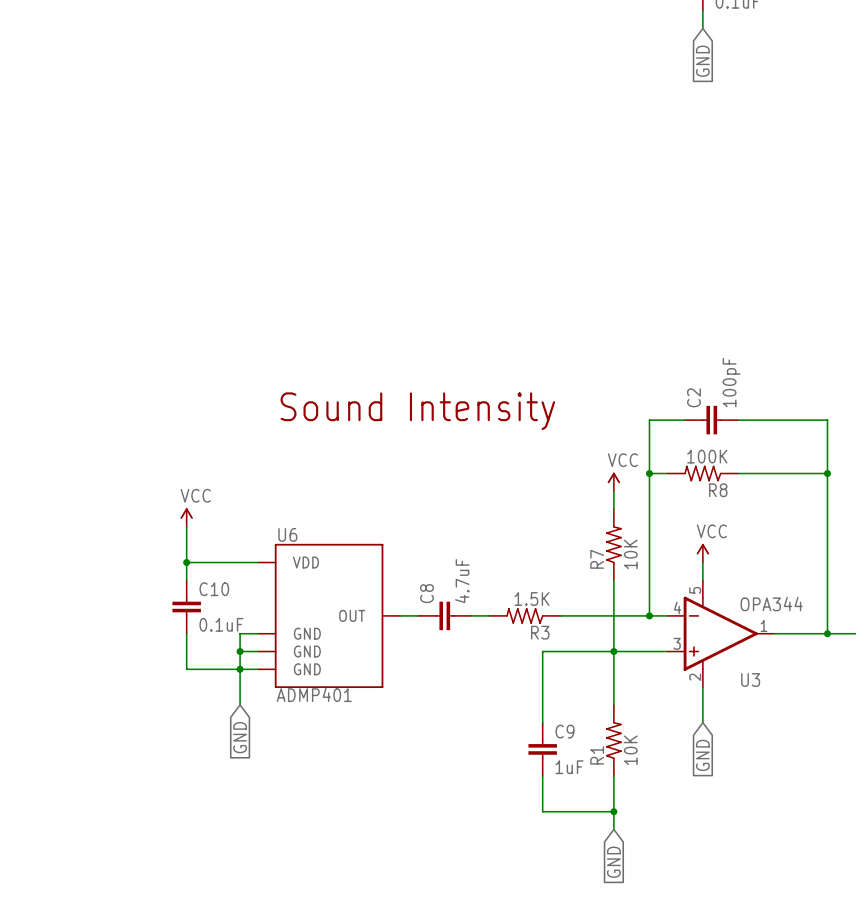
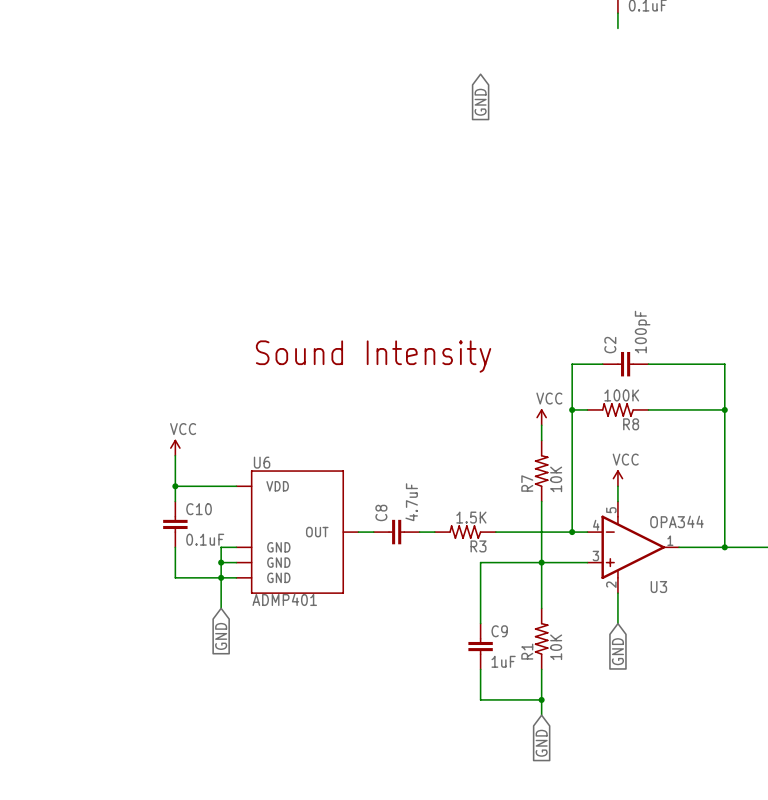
global label: GND (702, 61) -> none
global label: none -> GND (480, 102)

